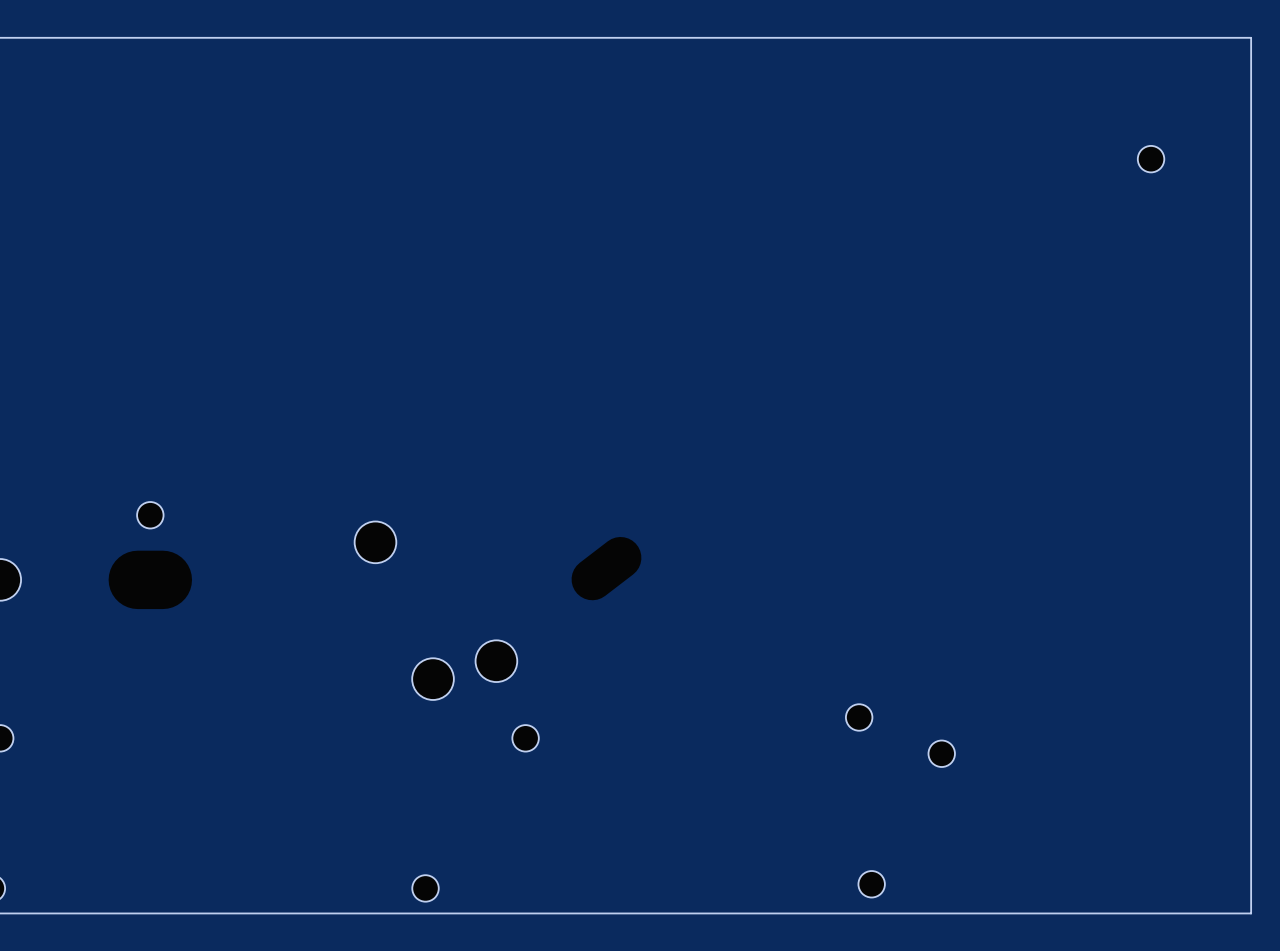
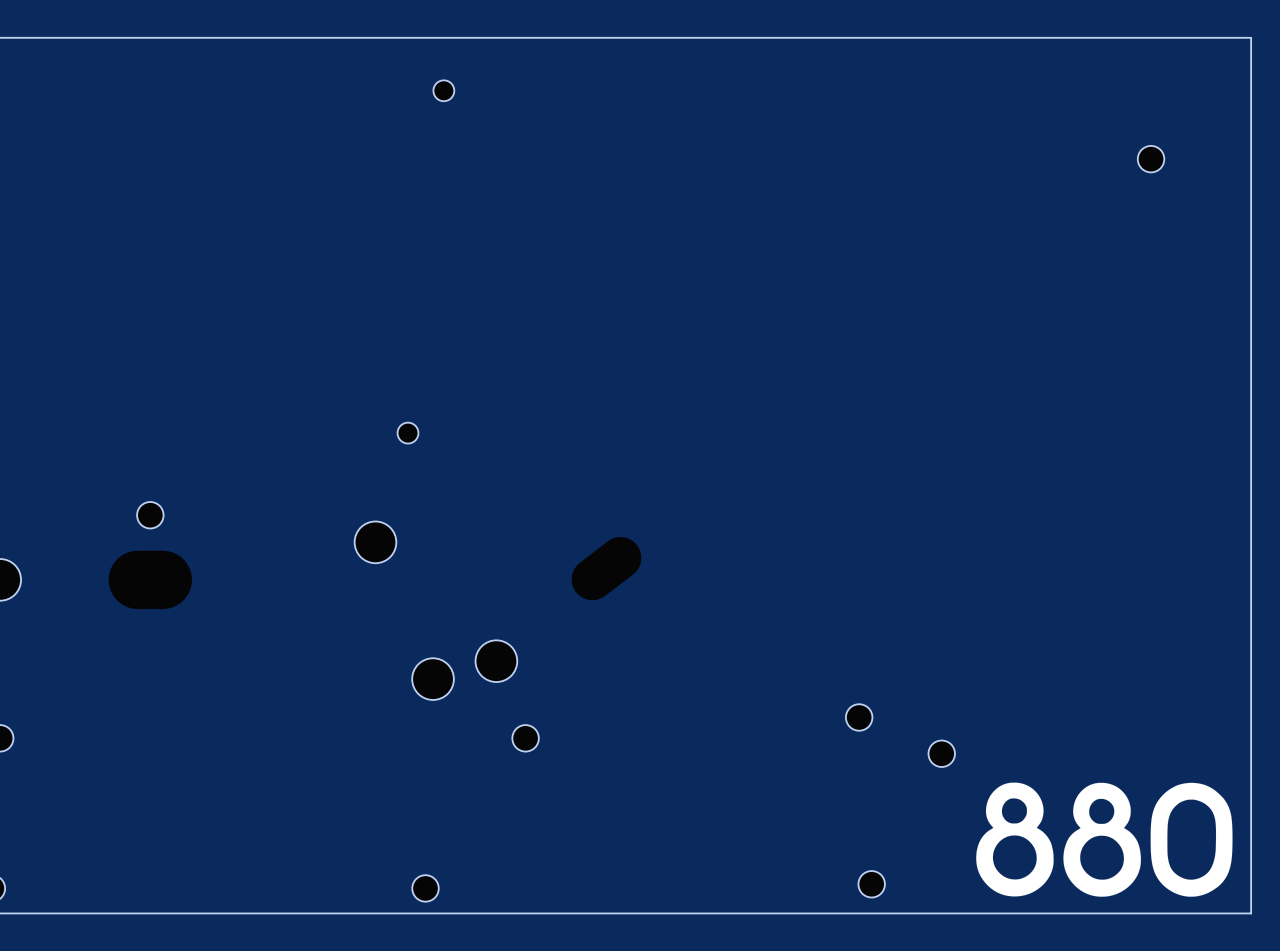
part: none -> (443, 90)
part: none -> (408, 433)
drawing: none -> [976, 782, 1233, 897]

